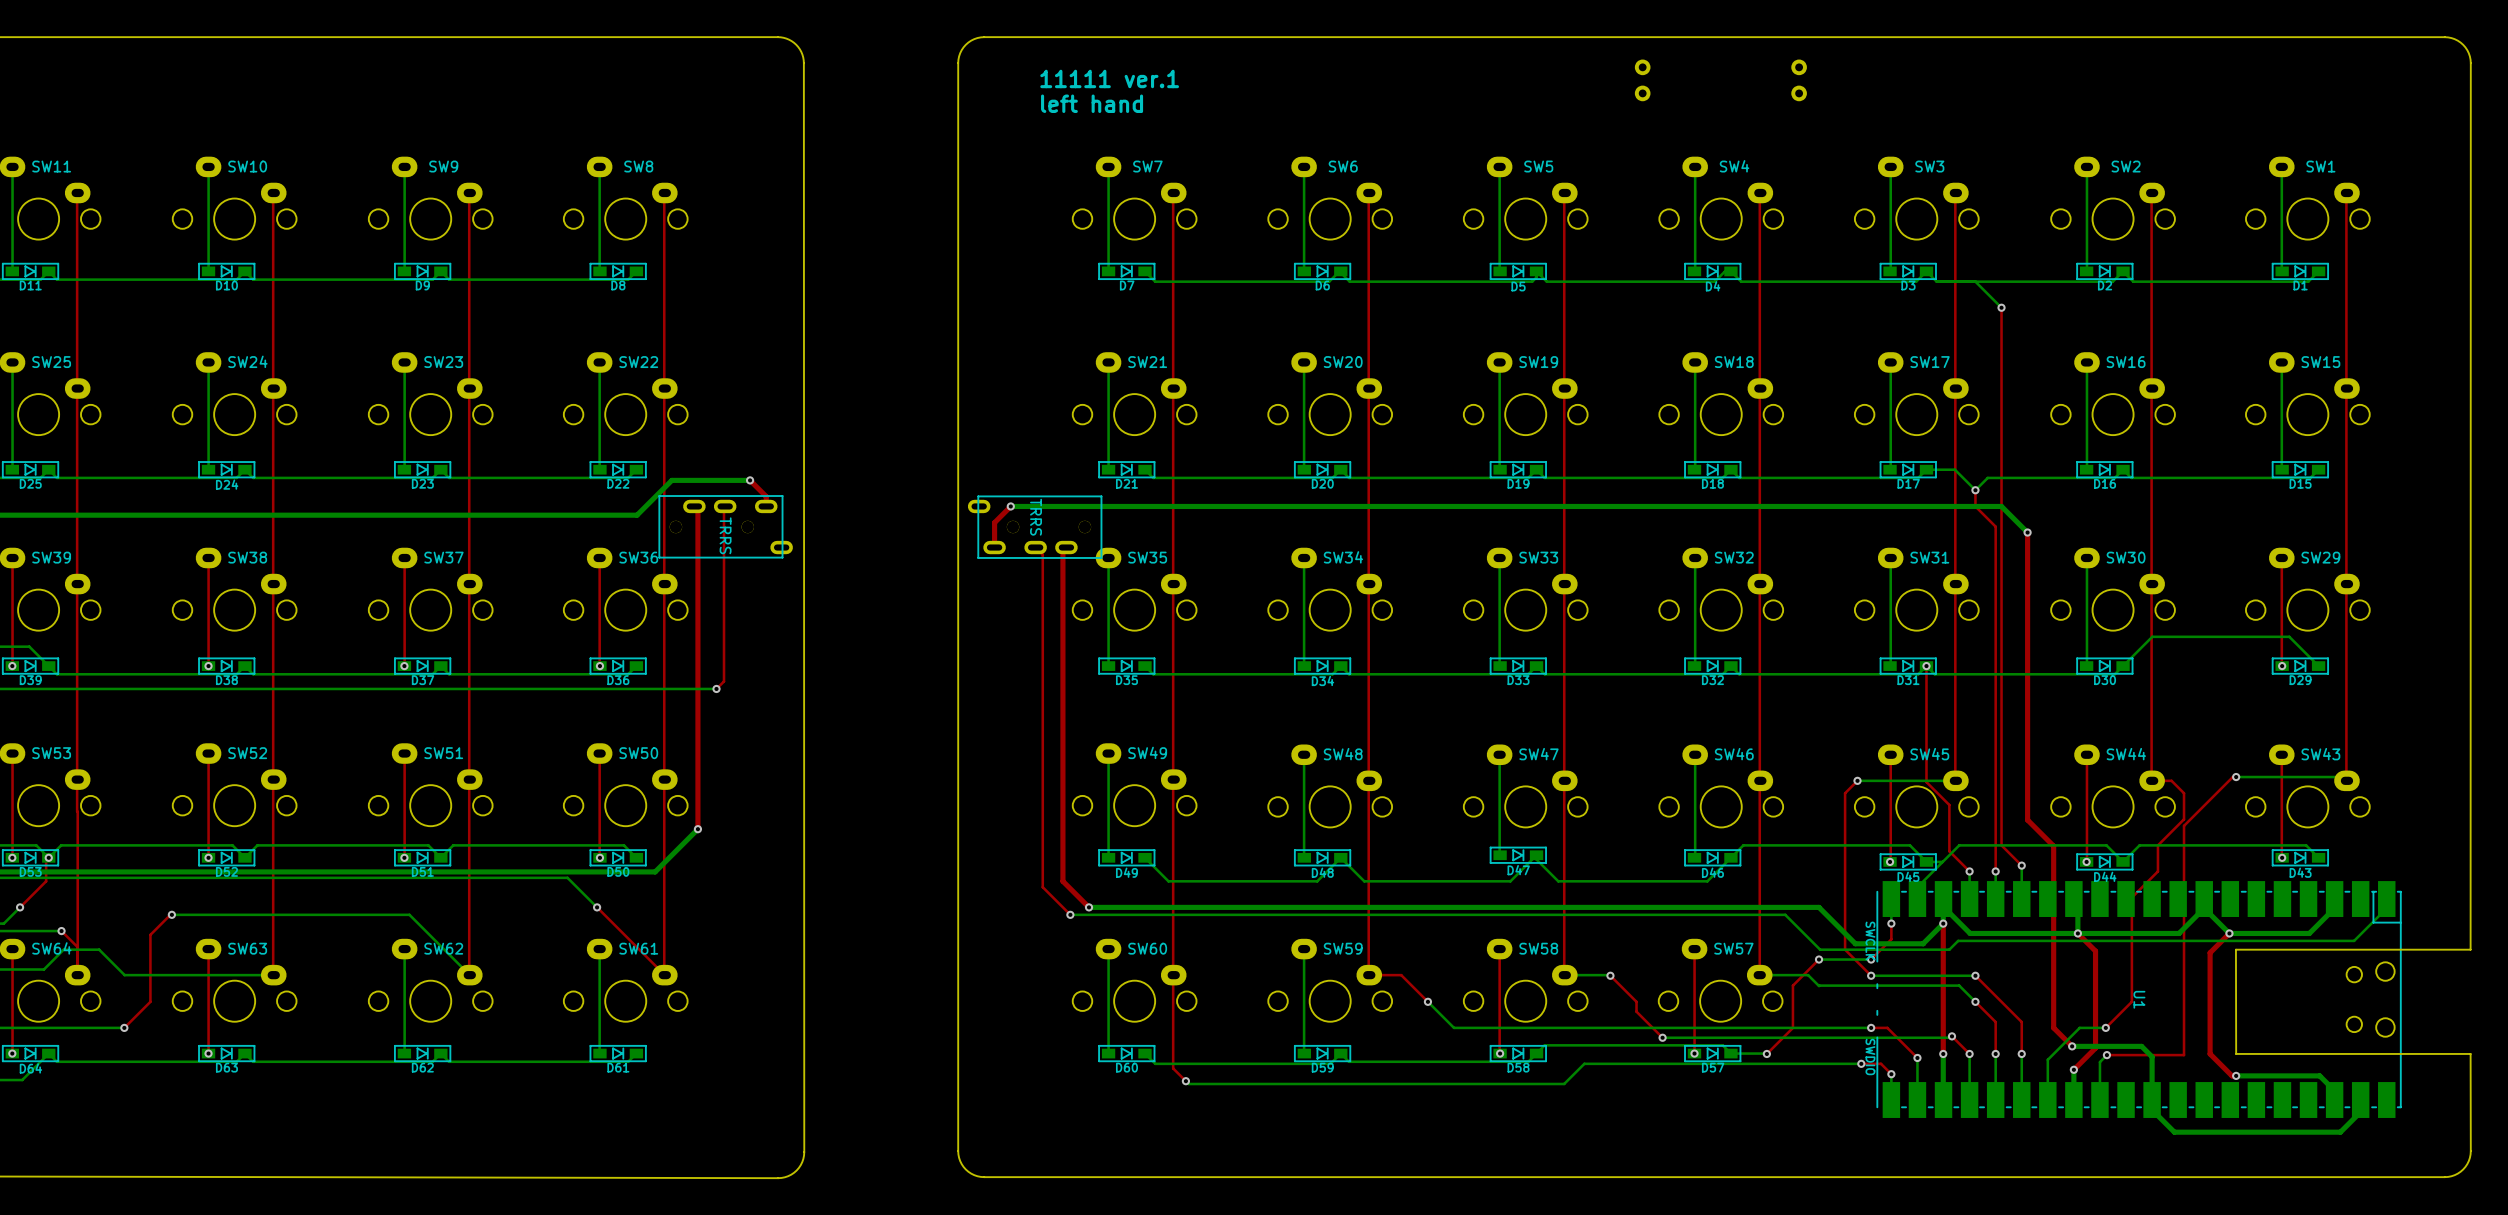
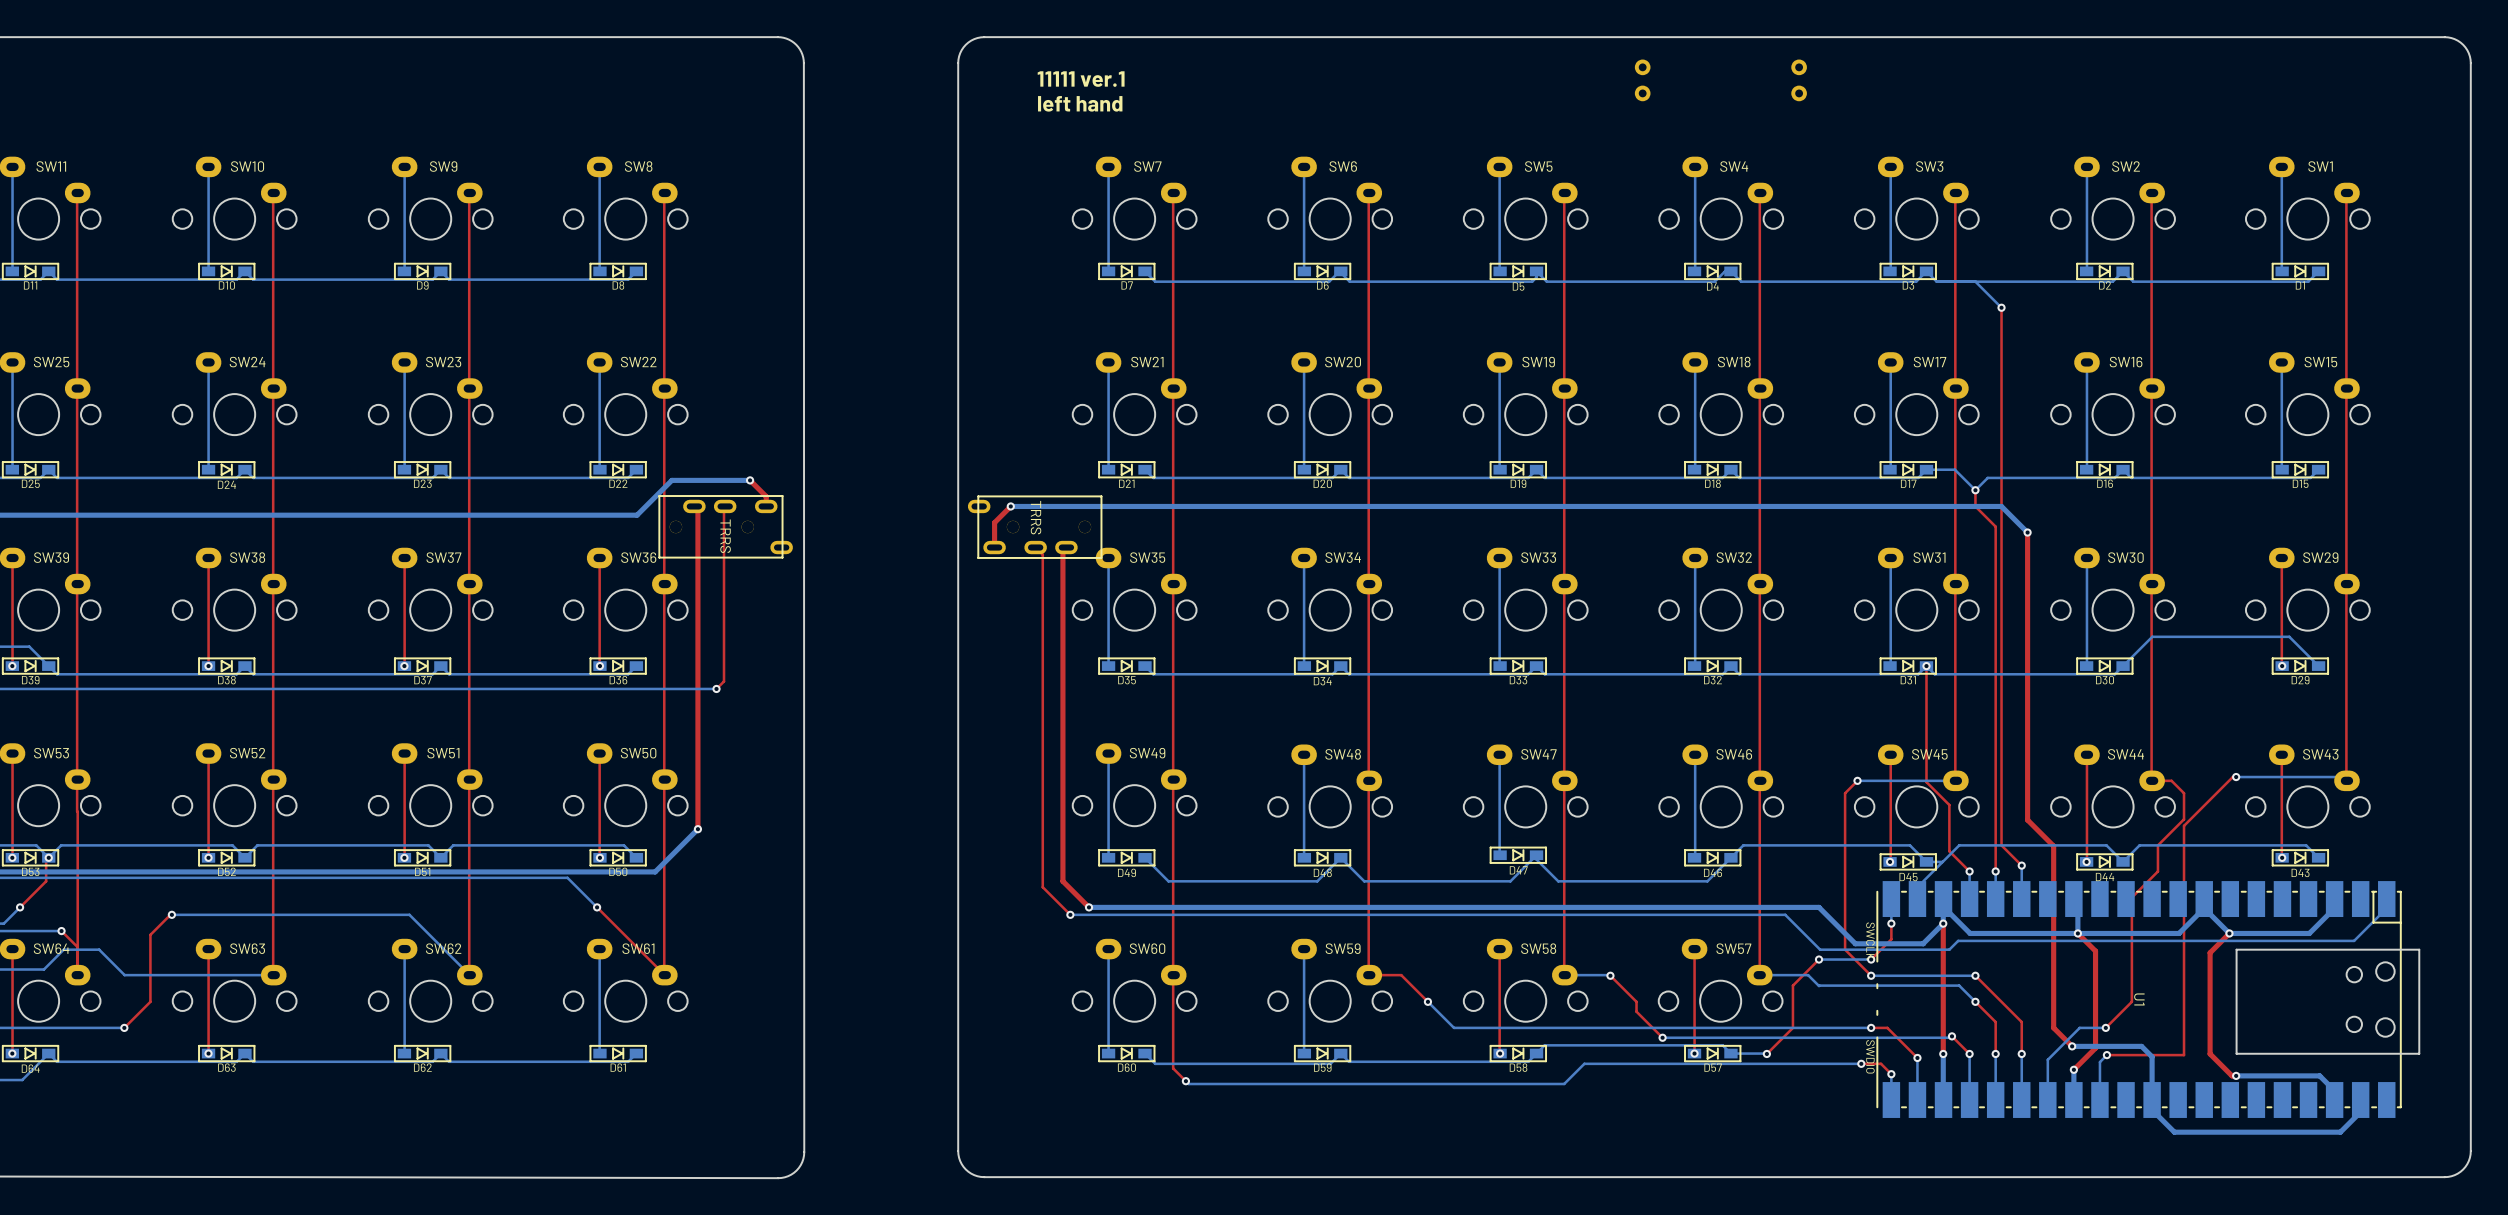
board edge: (2470, 63) (2470, 949) (2419, 949) -> (2470, 63) (2470, 1151)
board edge: (2236, 949) (2236, 1053) (2470, 1053) (2470, 1151) -> (2236, 949) (2236, 1053) (2419, 1053) (2419, 949)

